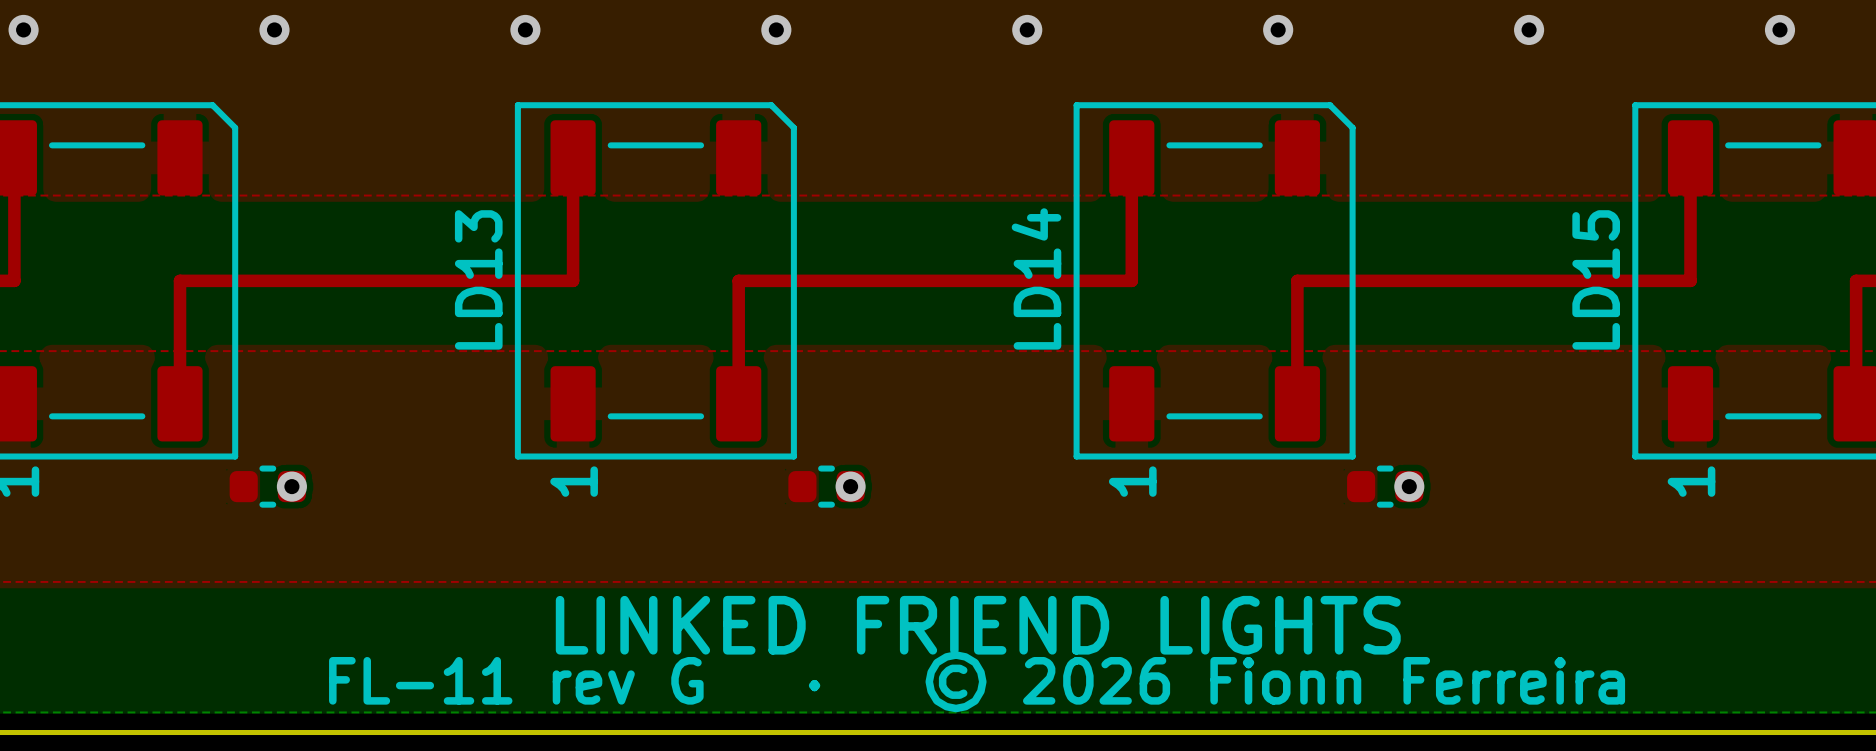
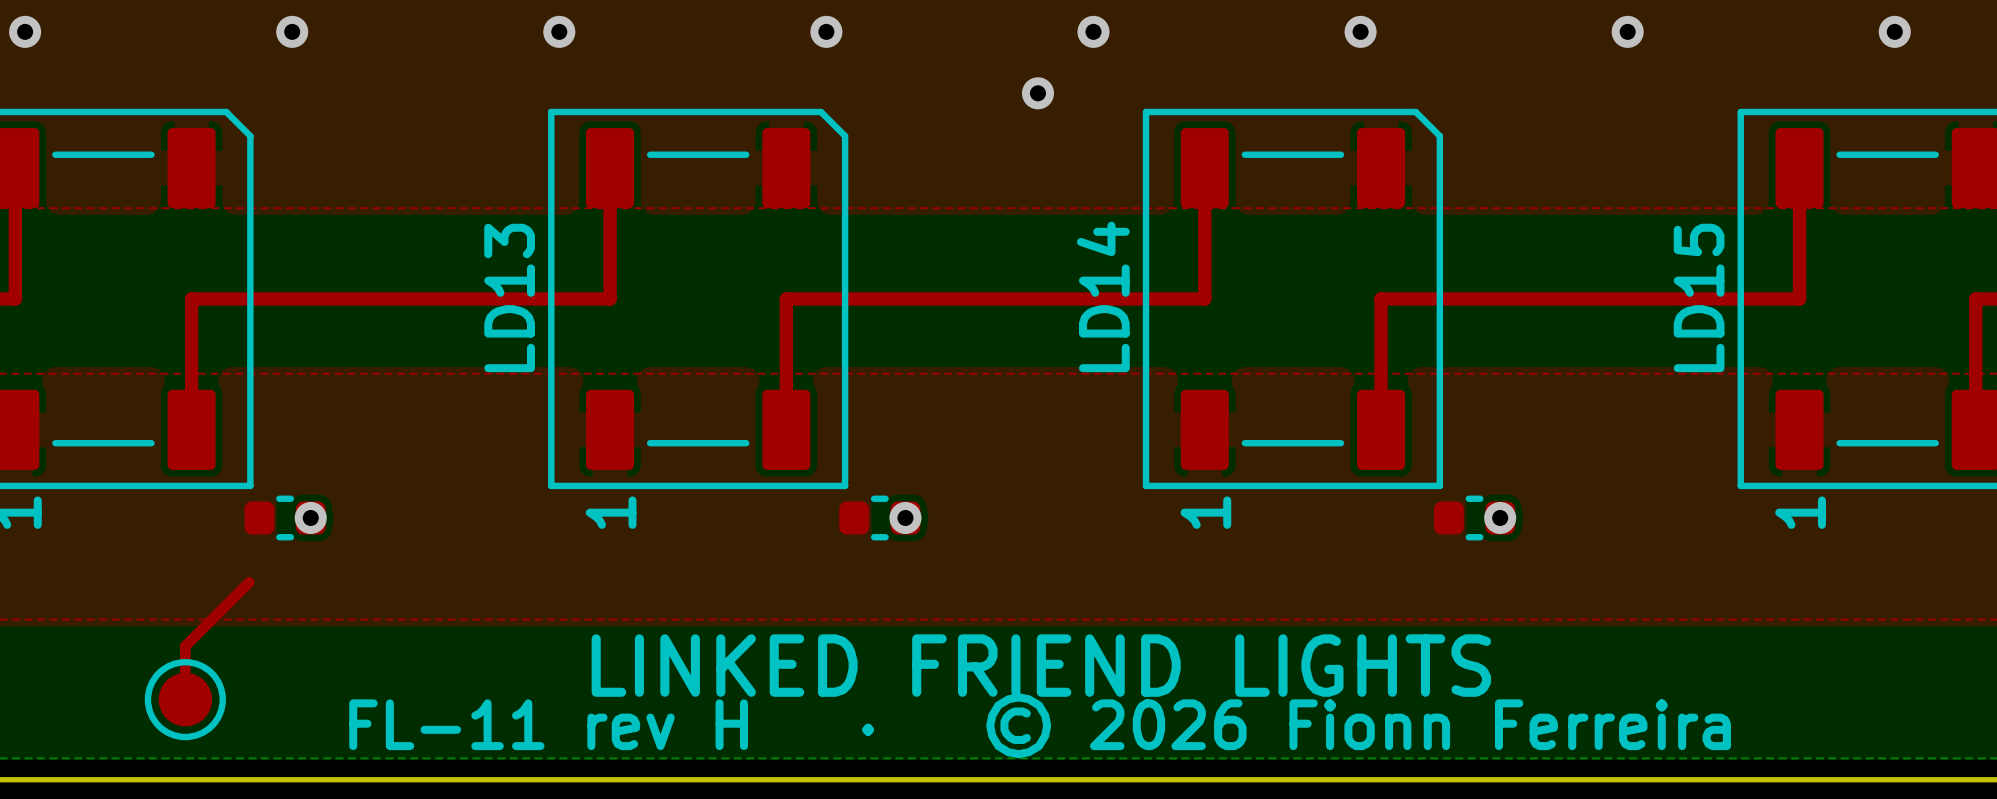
via: none -> (1037, 93)
top track: none -> (249, 582) (185, 646) (185, 699)
part: none -> (185, 699)
text: FL-11 rev G · © 2026 Fionn Ferreira (977, 681) -> FL-11 rev H · © 2026 Fionn Ferreira (1040, 725)

